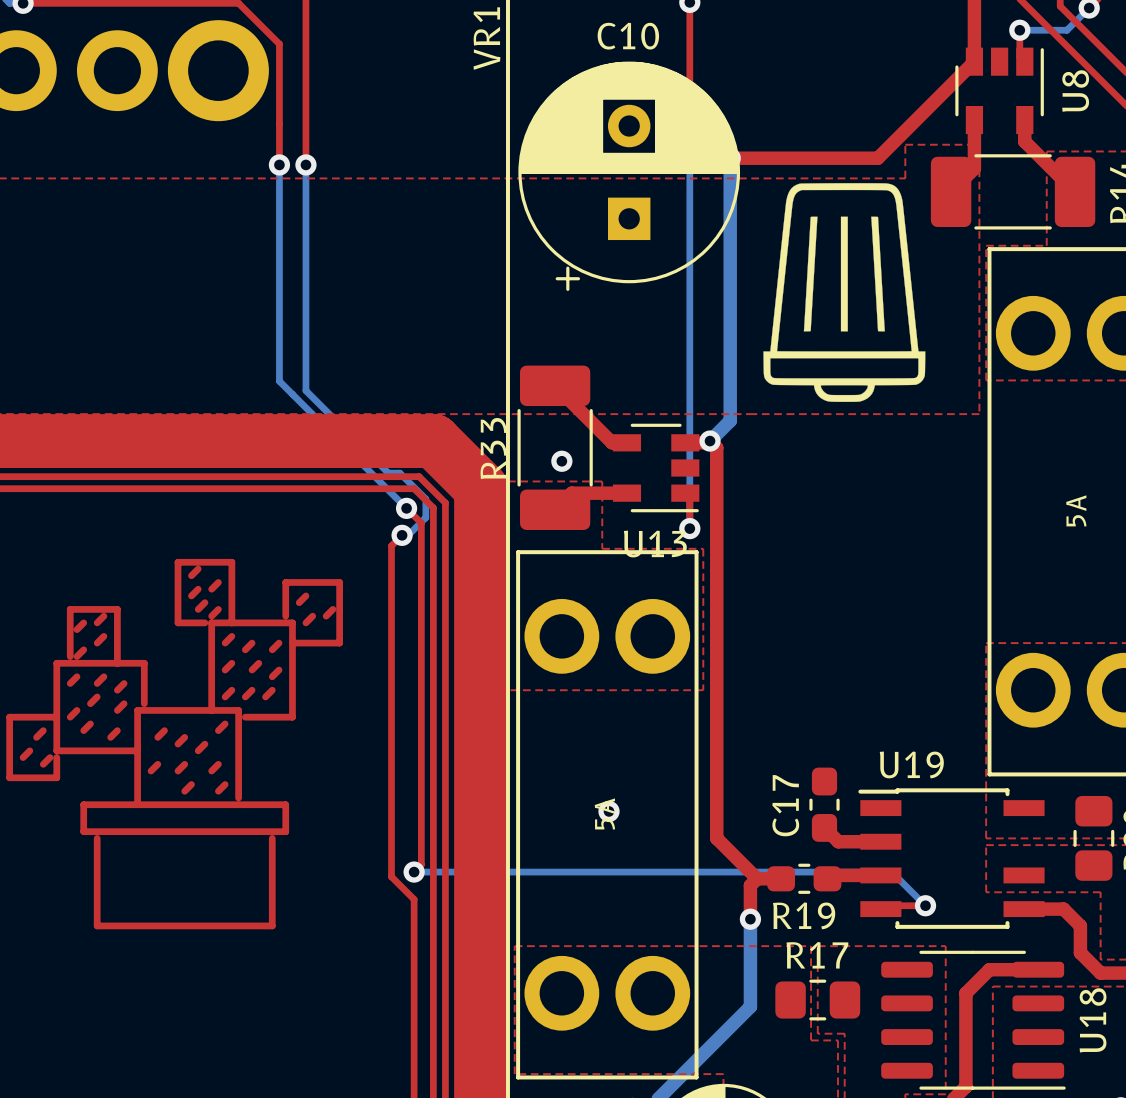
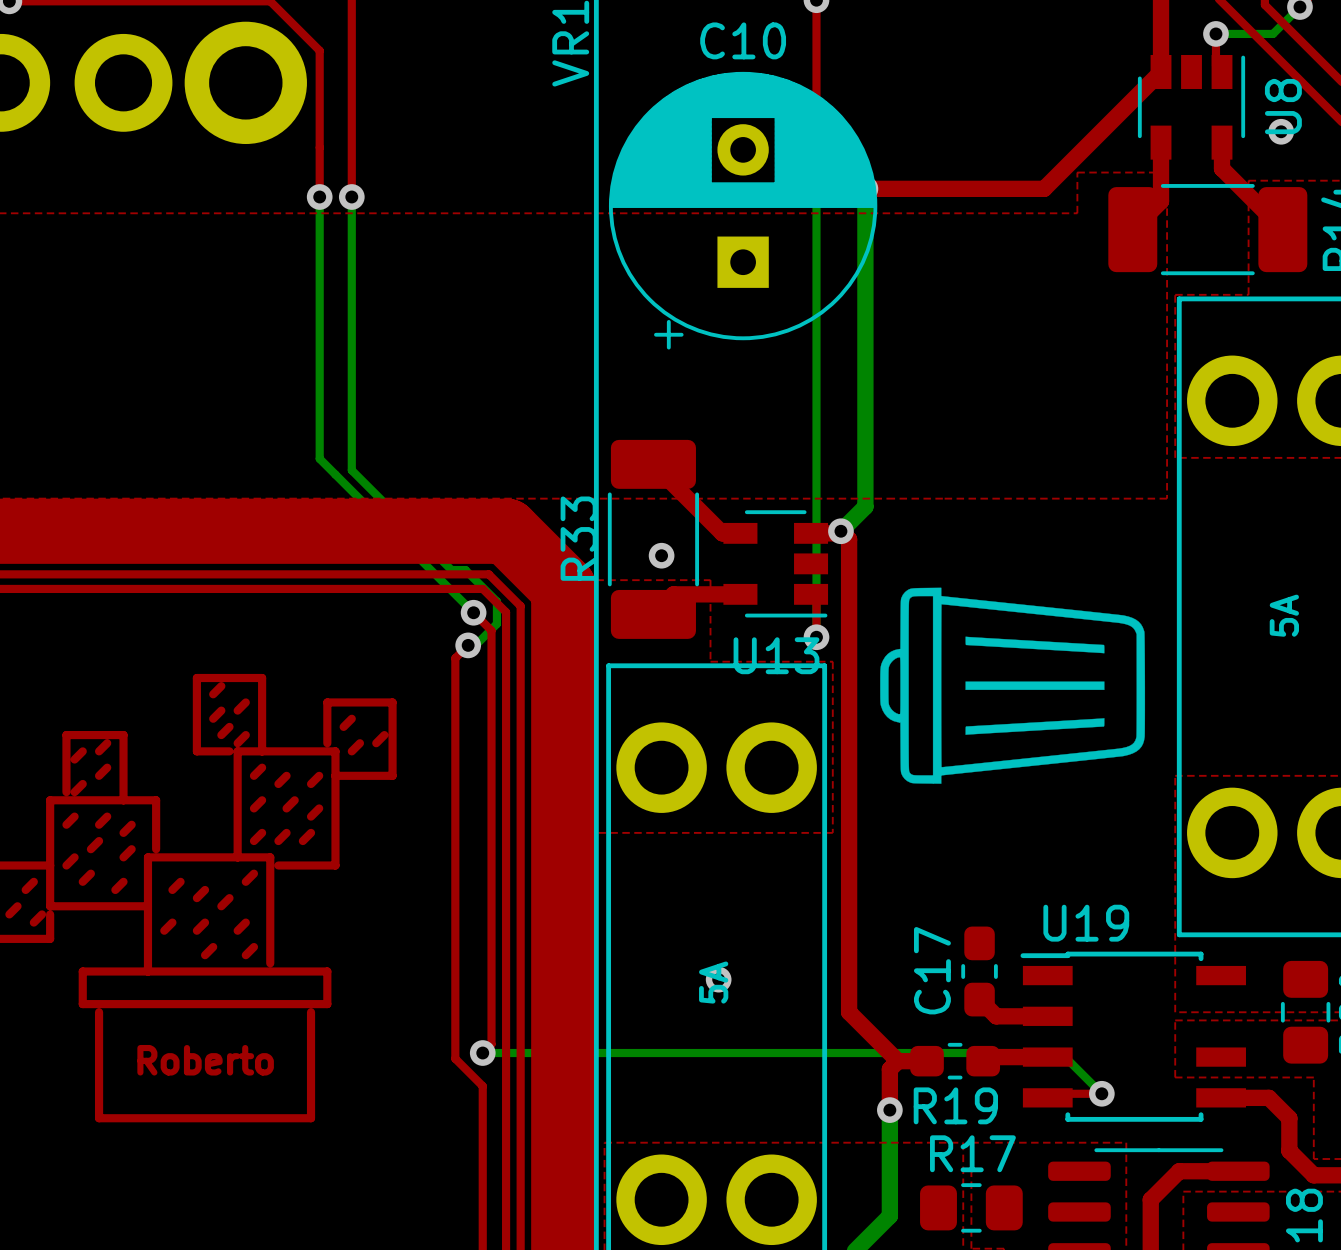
via: none -> (1281, 131)
drawing: [763, 183, 926, 402] -> none
drawing: none -> [880, 587, 1146, 784]
text: none -> Roberto (205, 1060)

